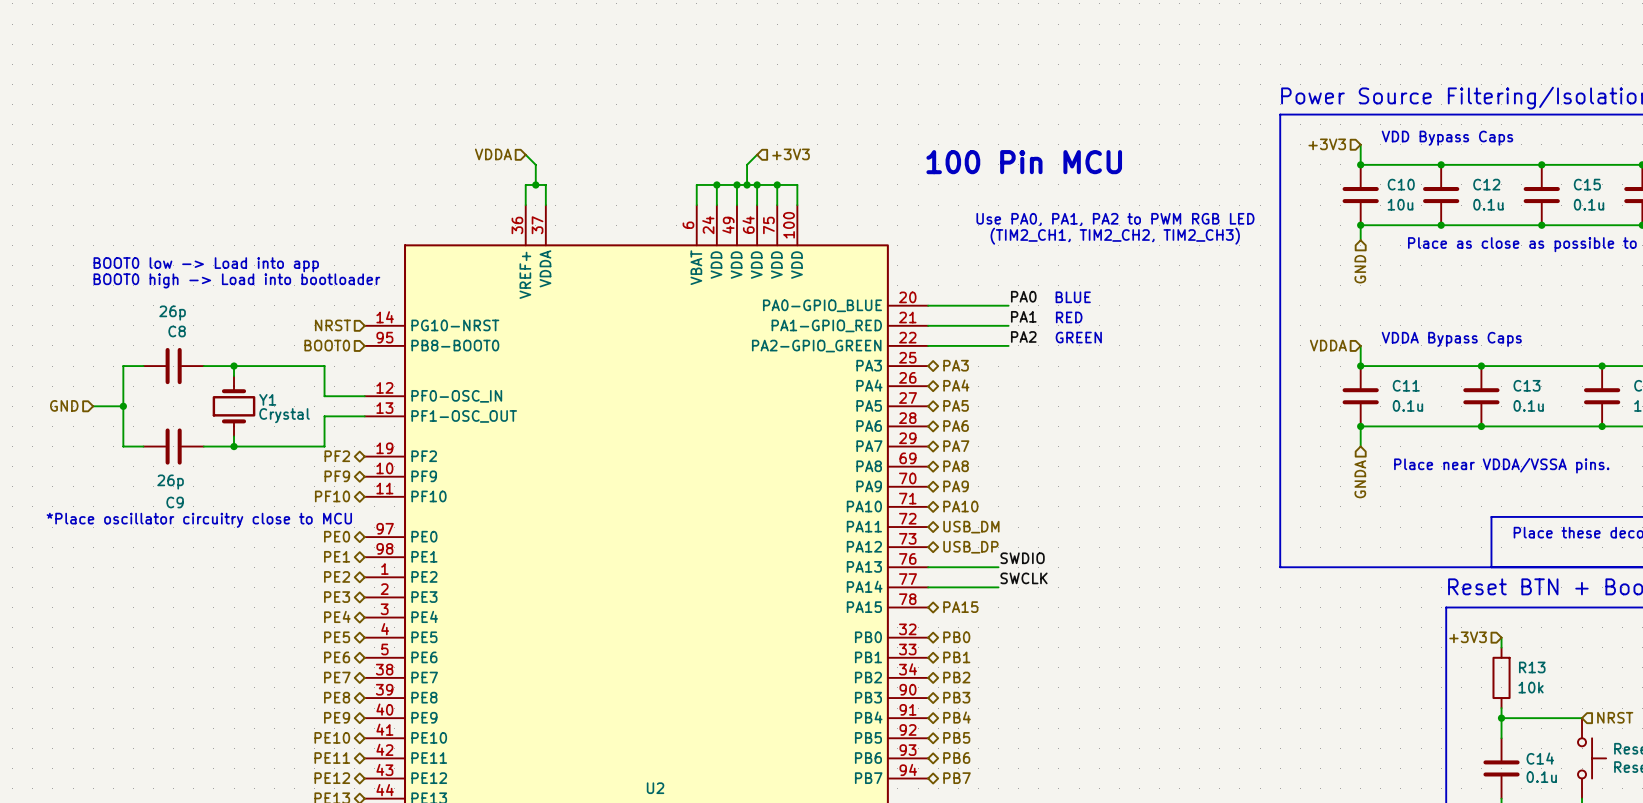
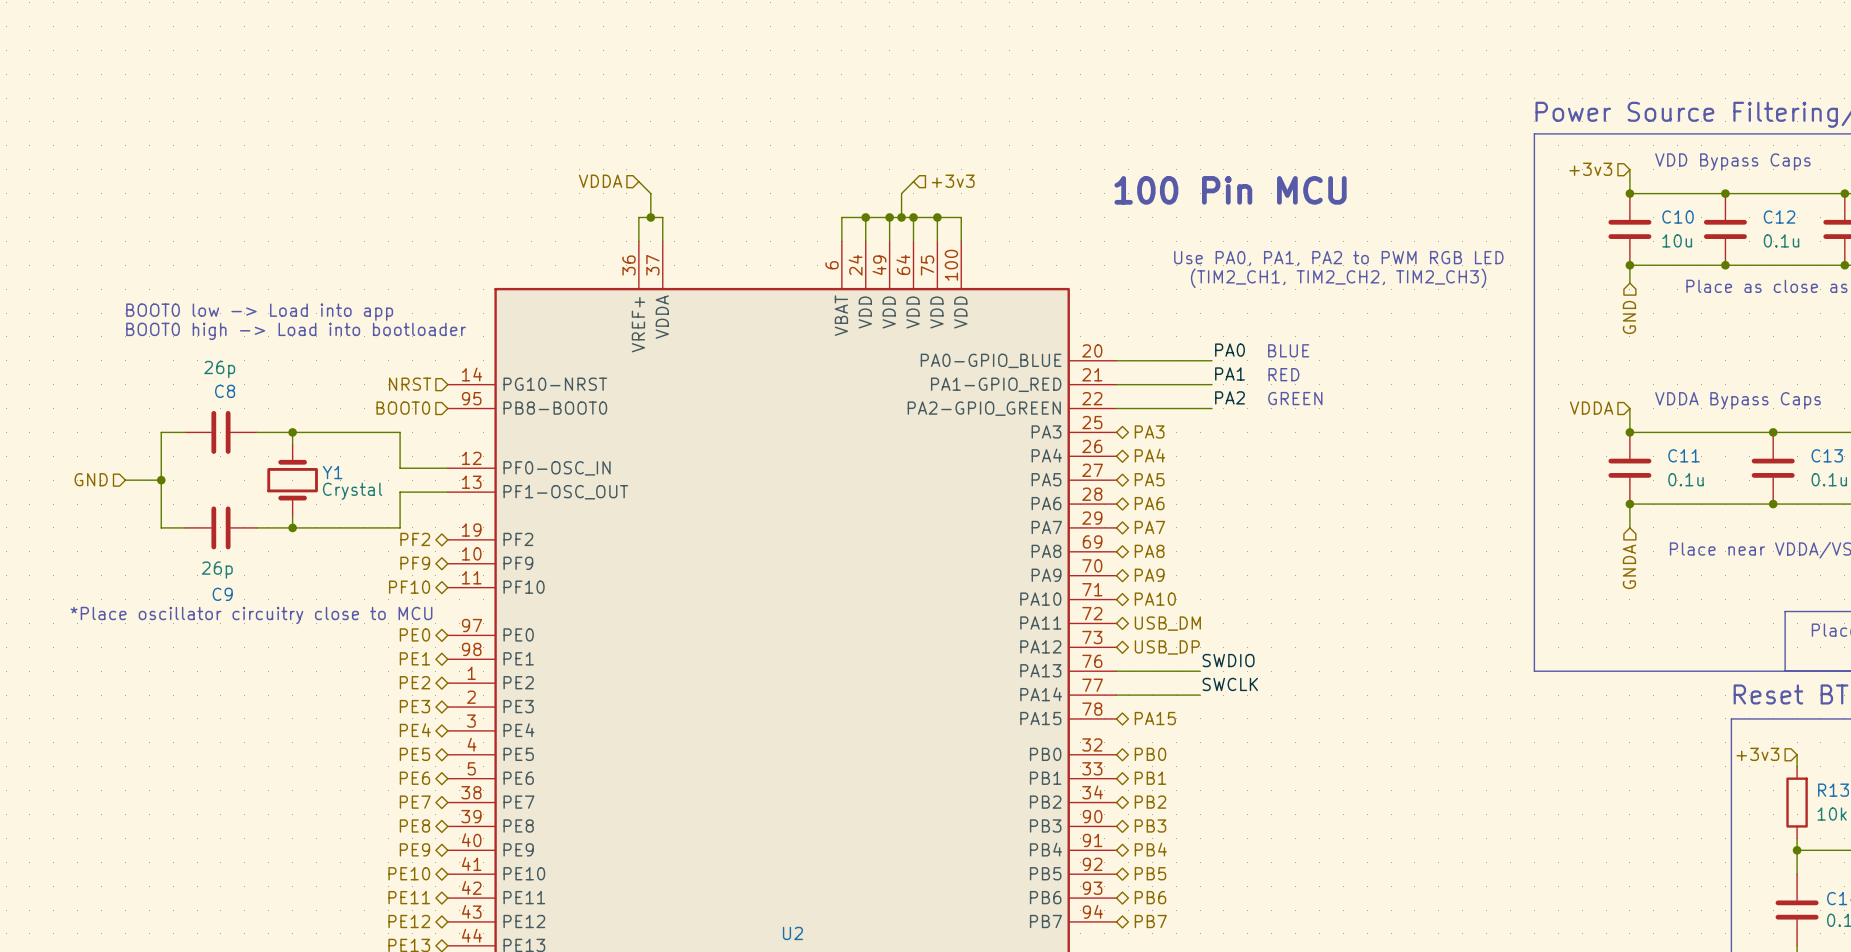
hierarchical label: +3V3 (1327, 144) -> +3v3 (1590, 169)
hierarchical label: +3V3 (791, 154) -> +3v3 (953, 181)
hierarchical label: +3V3 (1468, 637) -> +3v3 (1757, 754)

